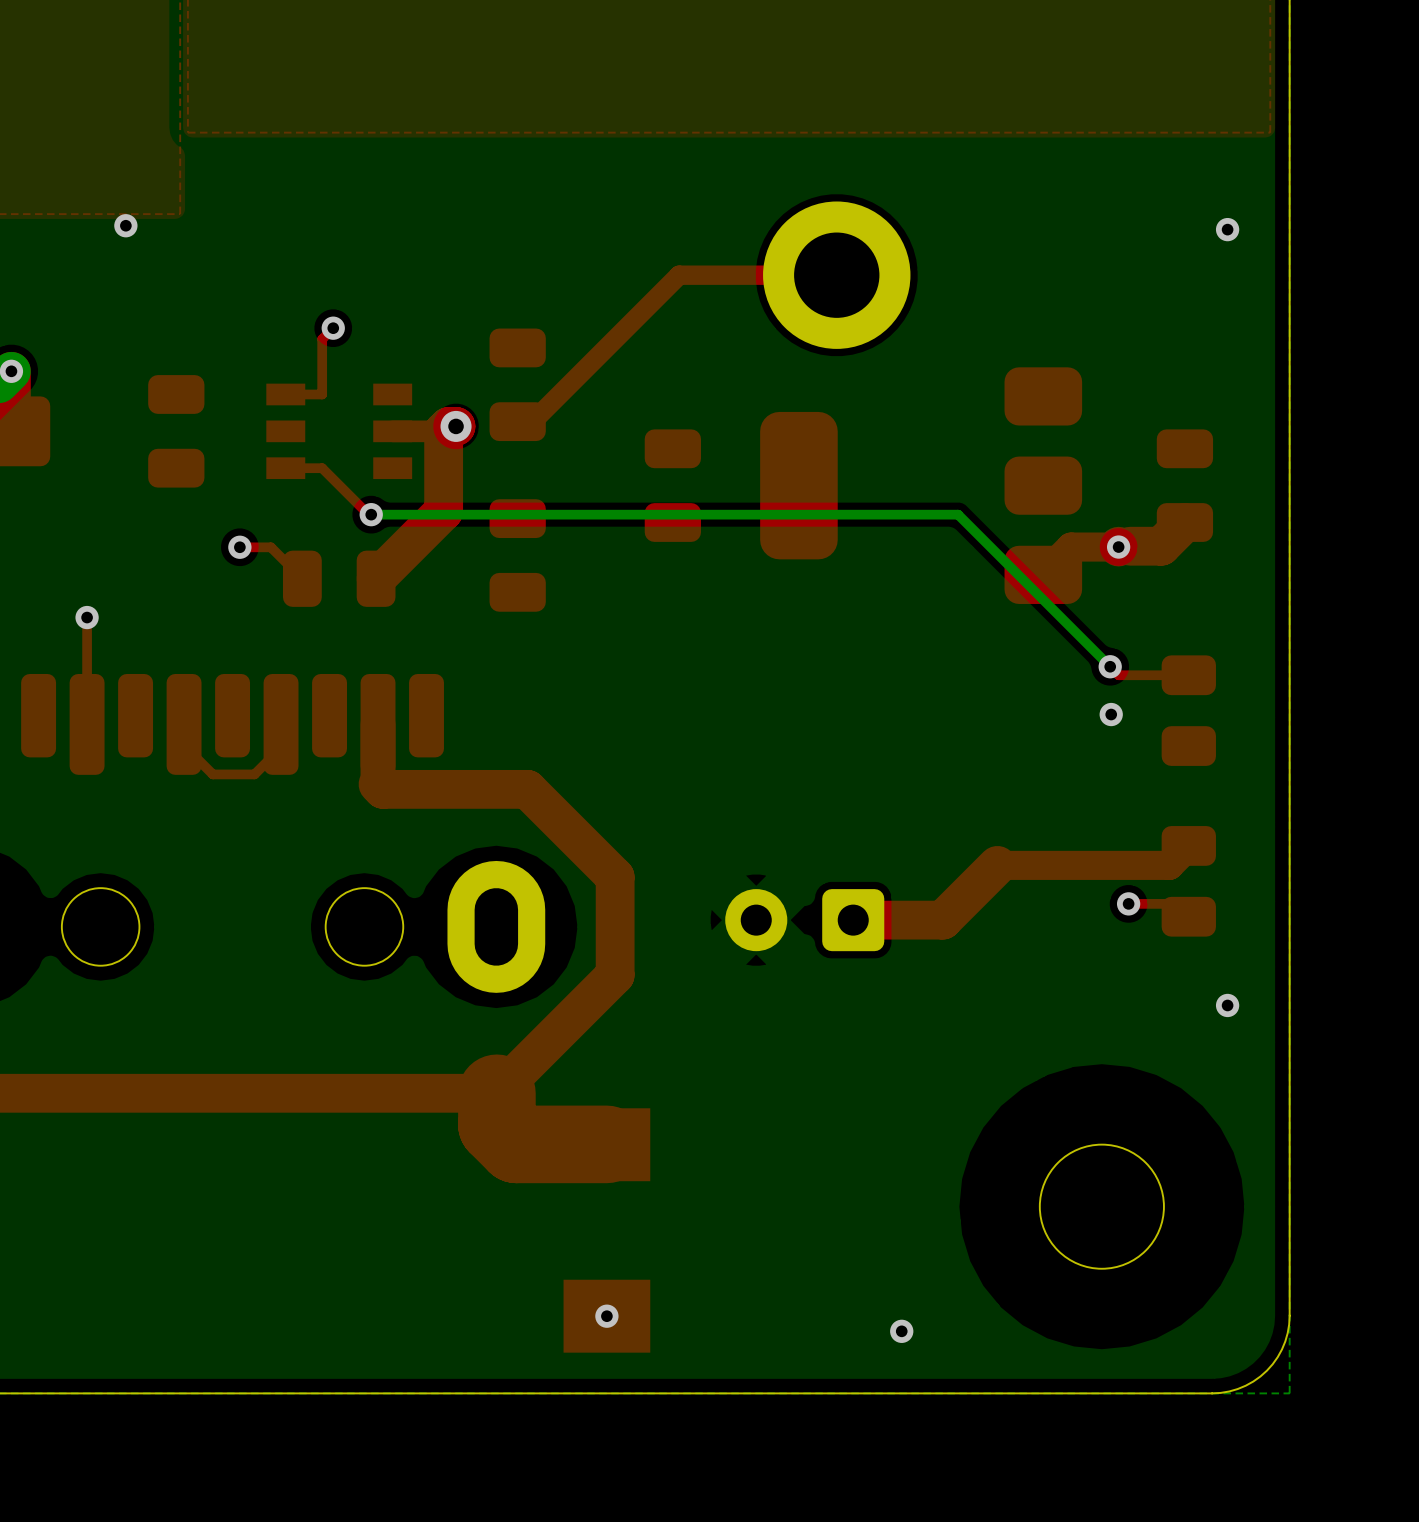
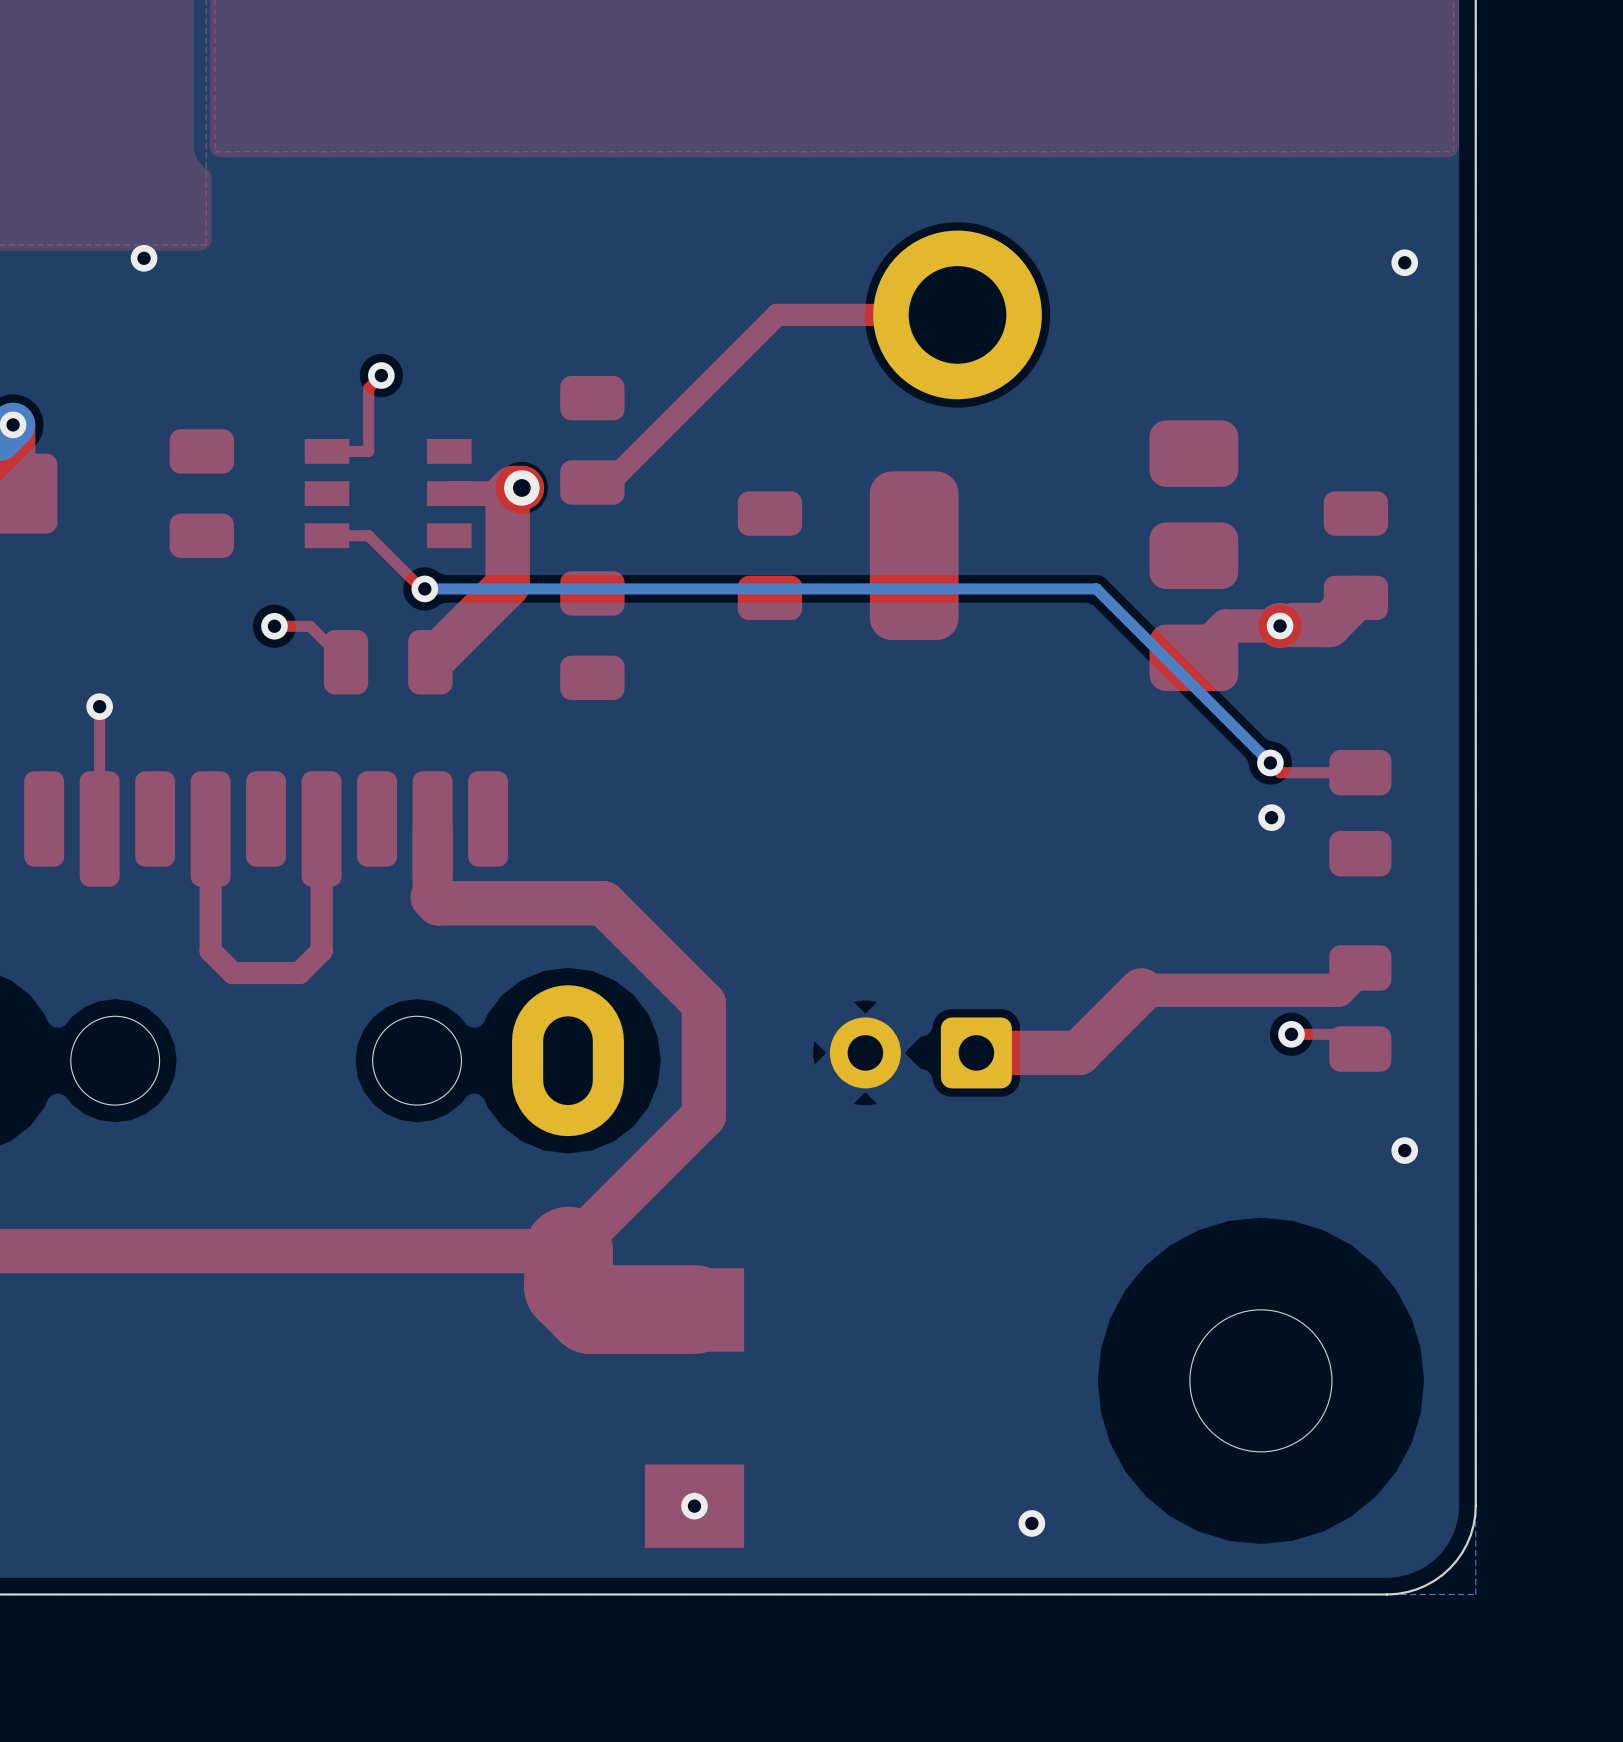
top track: (184, 745) (212, 774) (254, 774) (281, 747) -> (210, 853) (210, 950) (232, 973) (299, 973) (321, 950) (321, 855)

